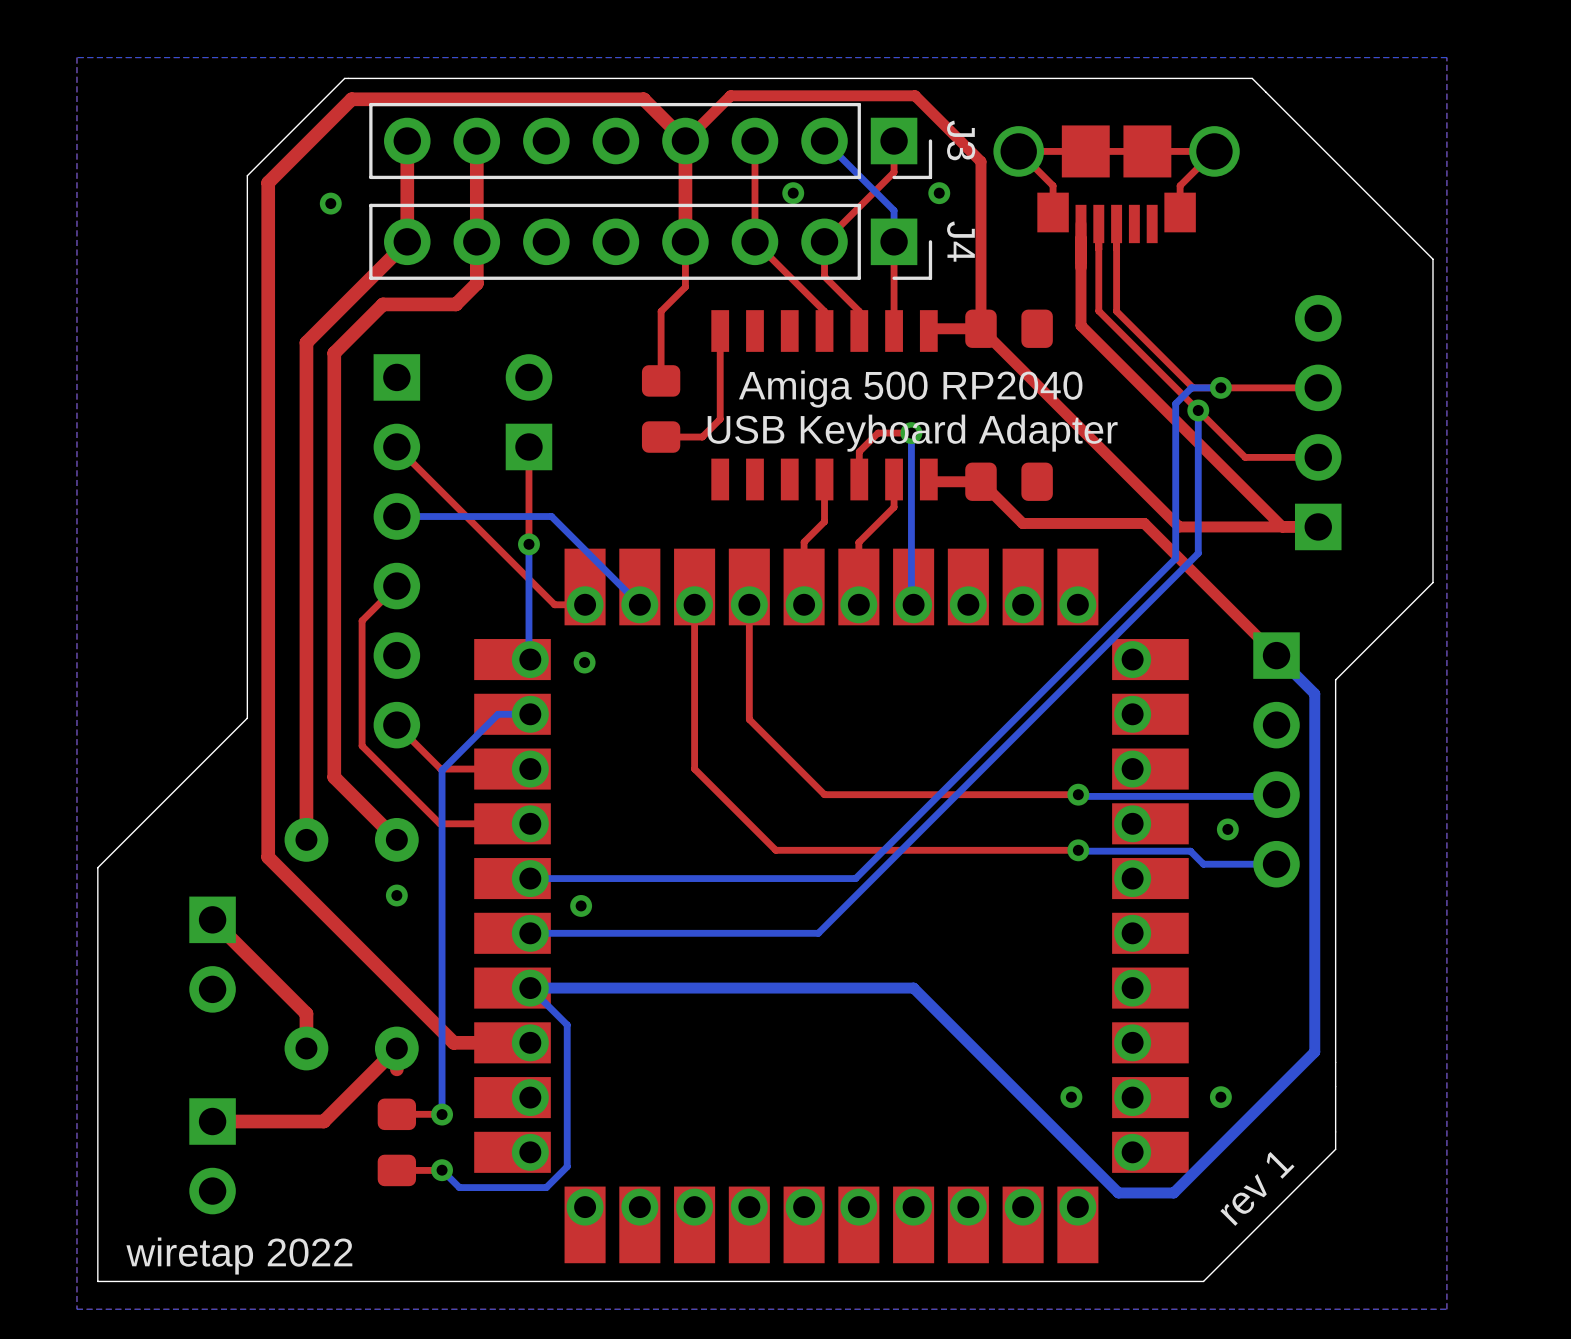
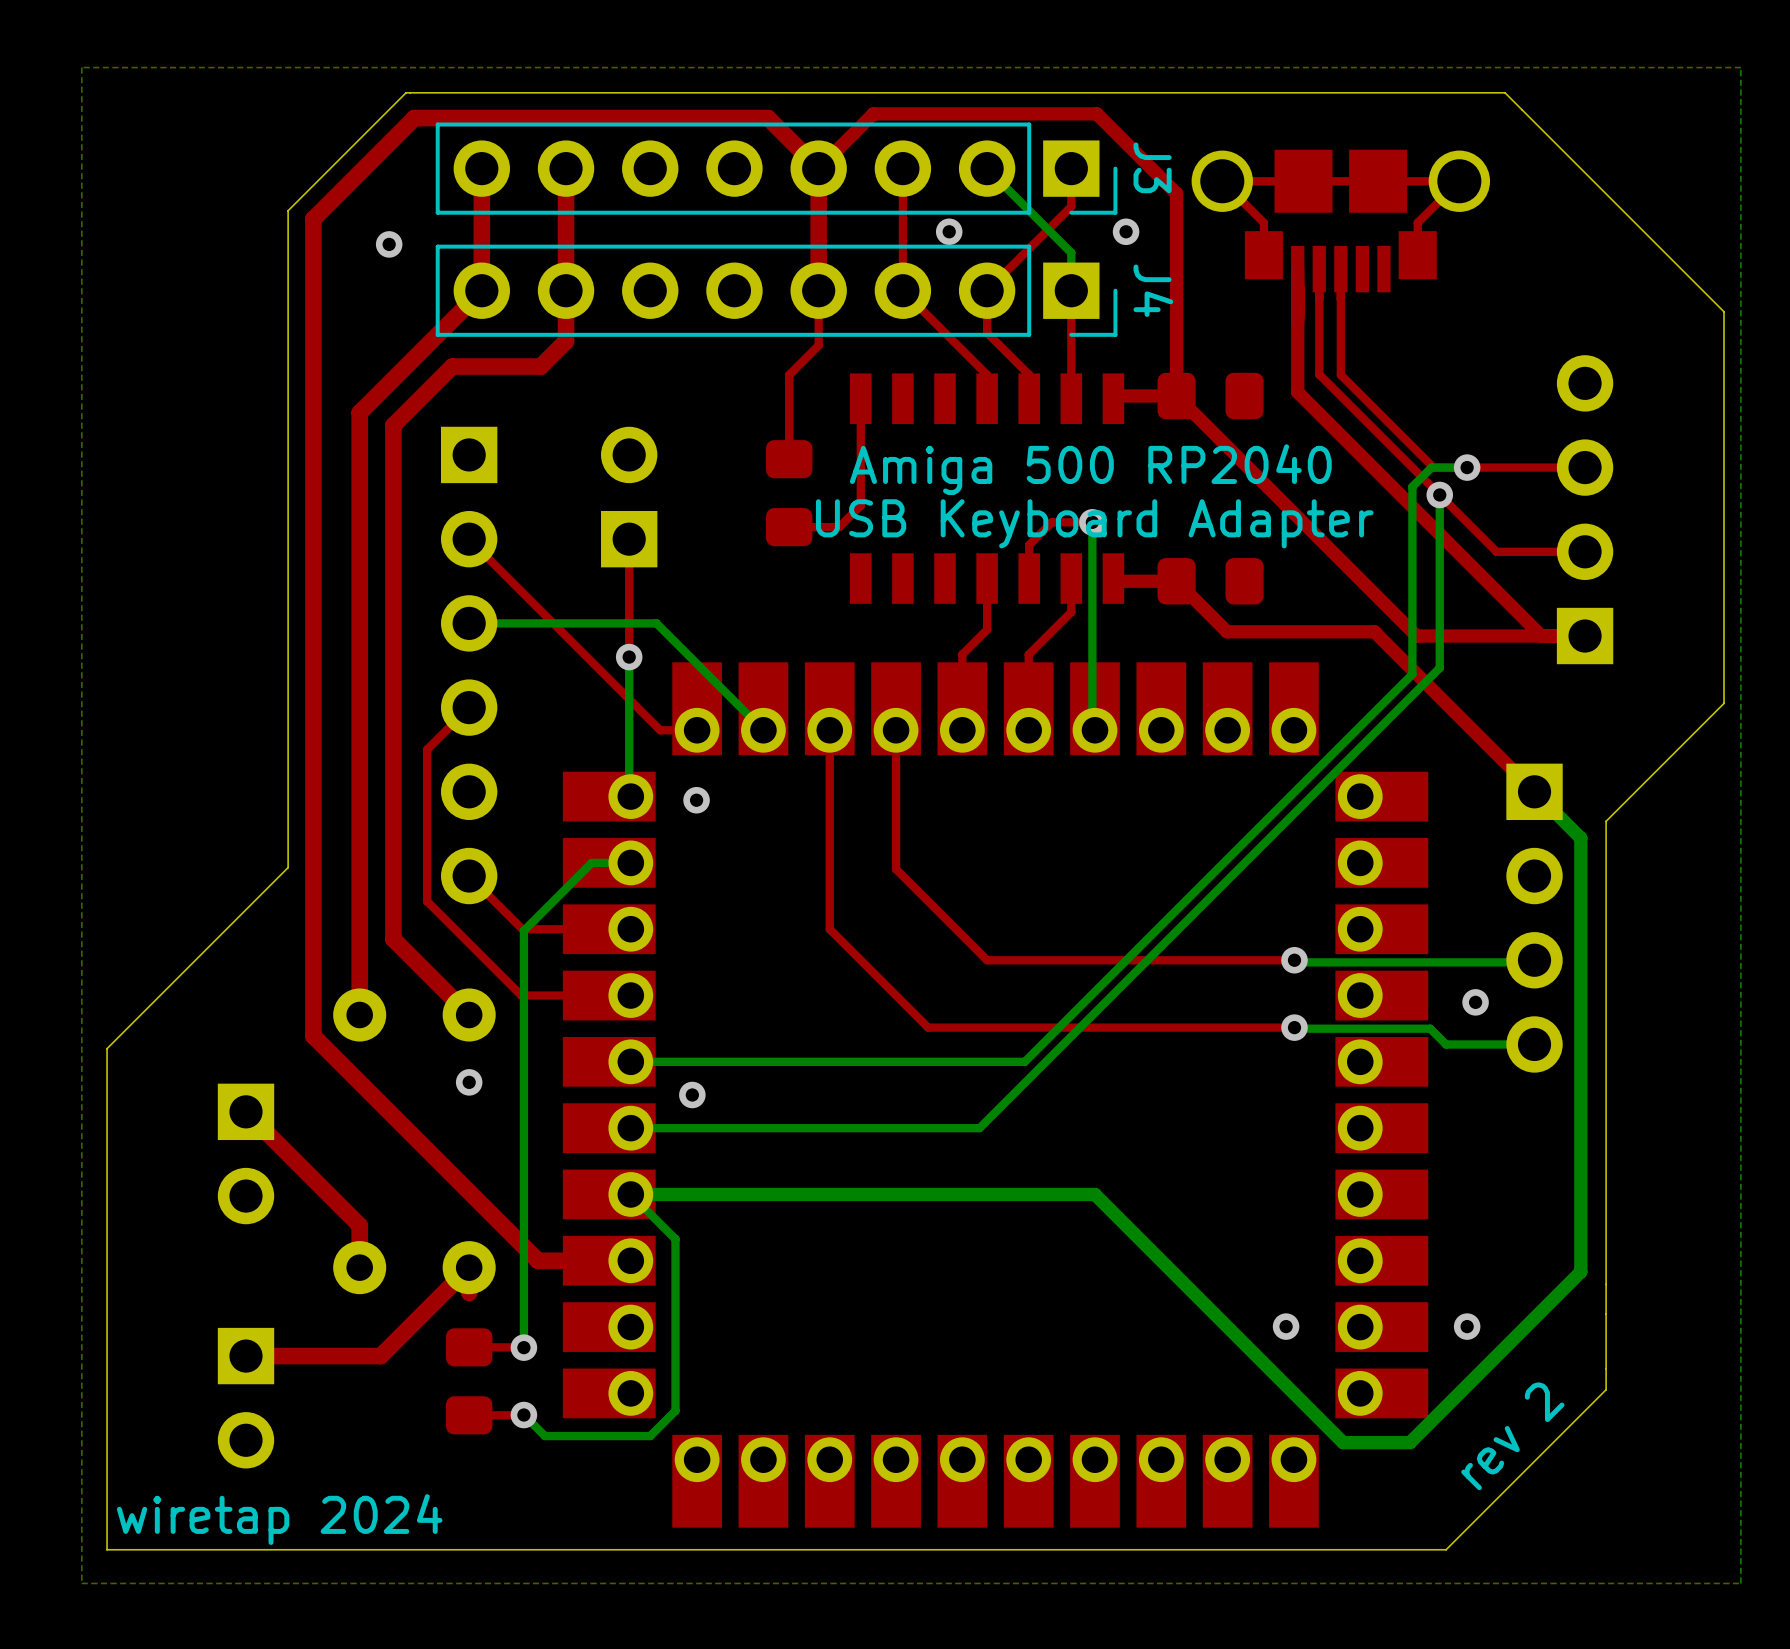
text: rev 1 (1257, 1188) -> rev 2 (1512, 1436)
text: wiretap 2022 (239, 1256) -> wiretap 2024 (279, 1519)

